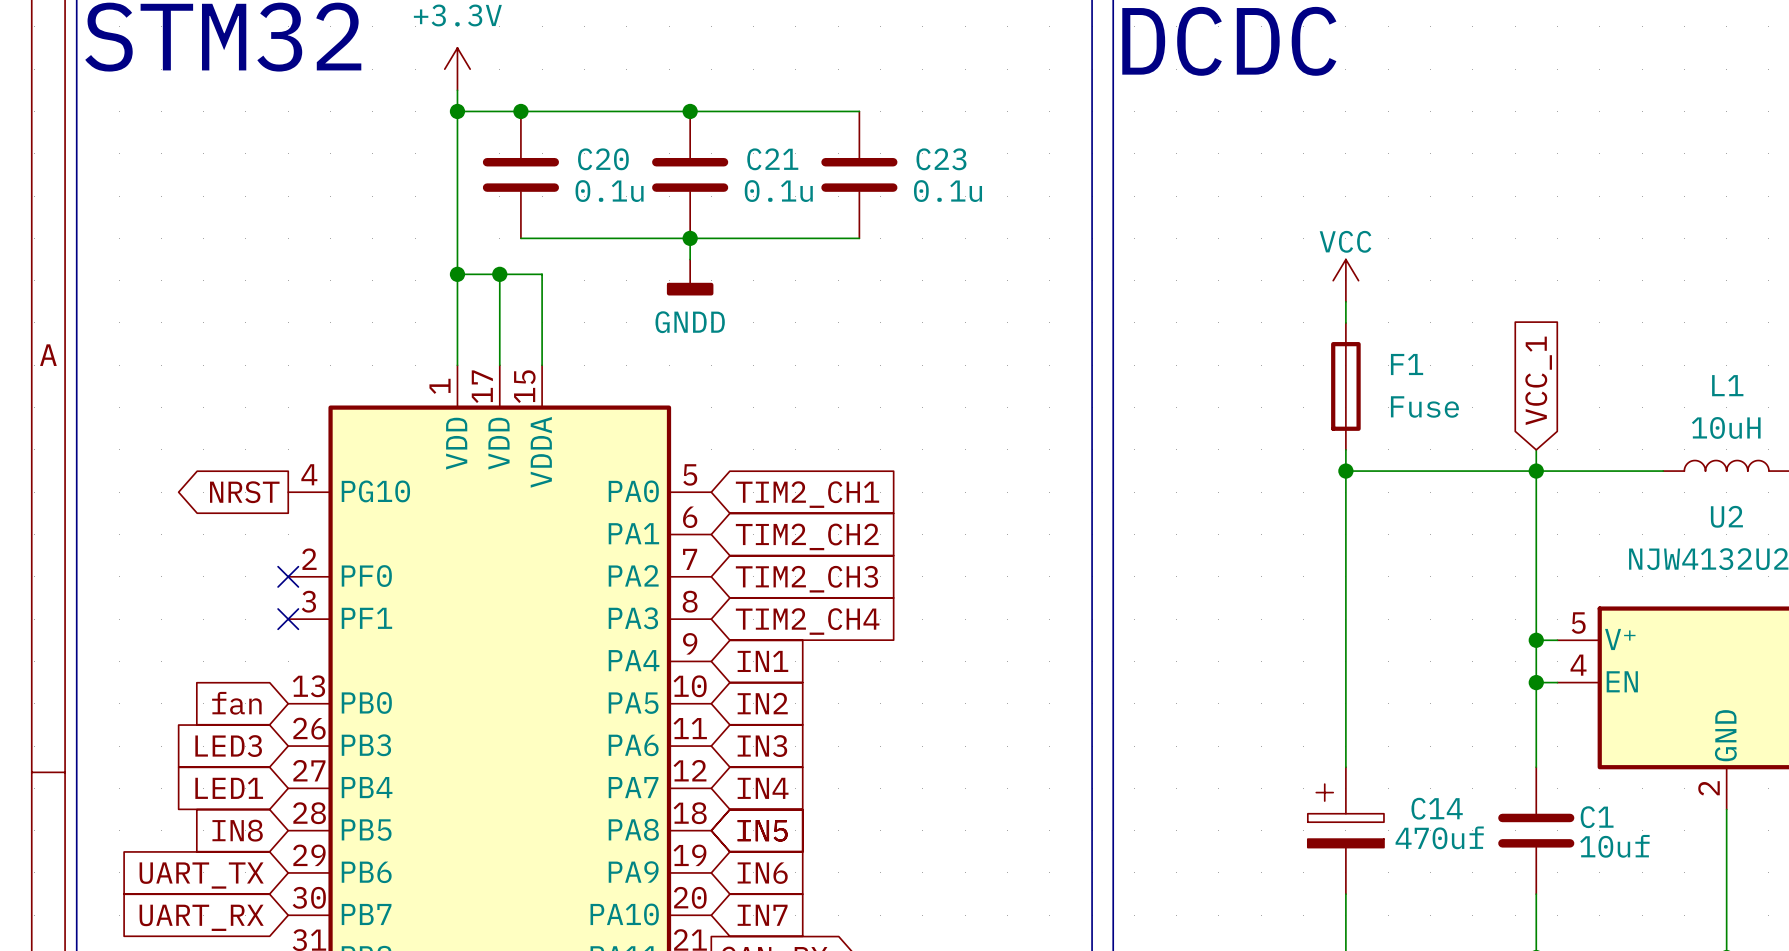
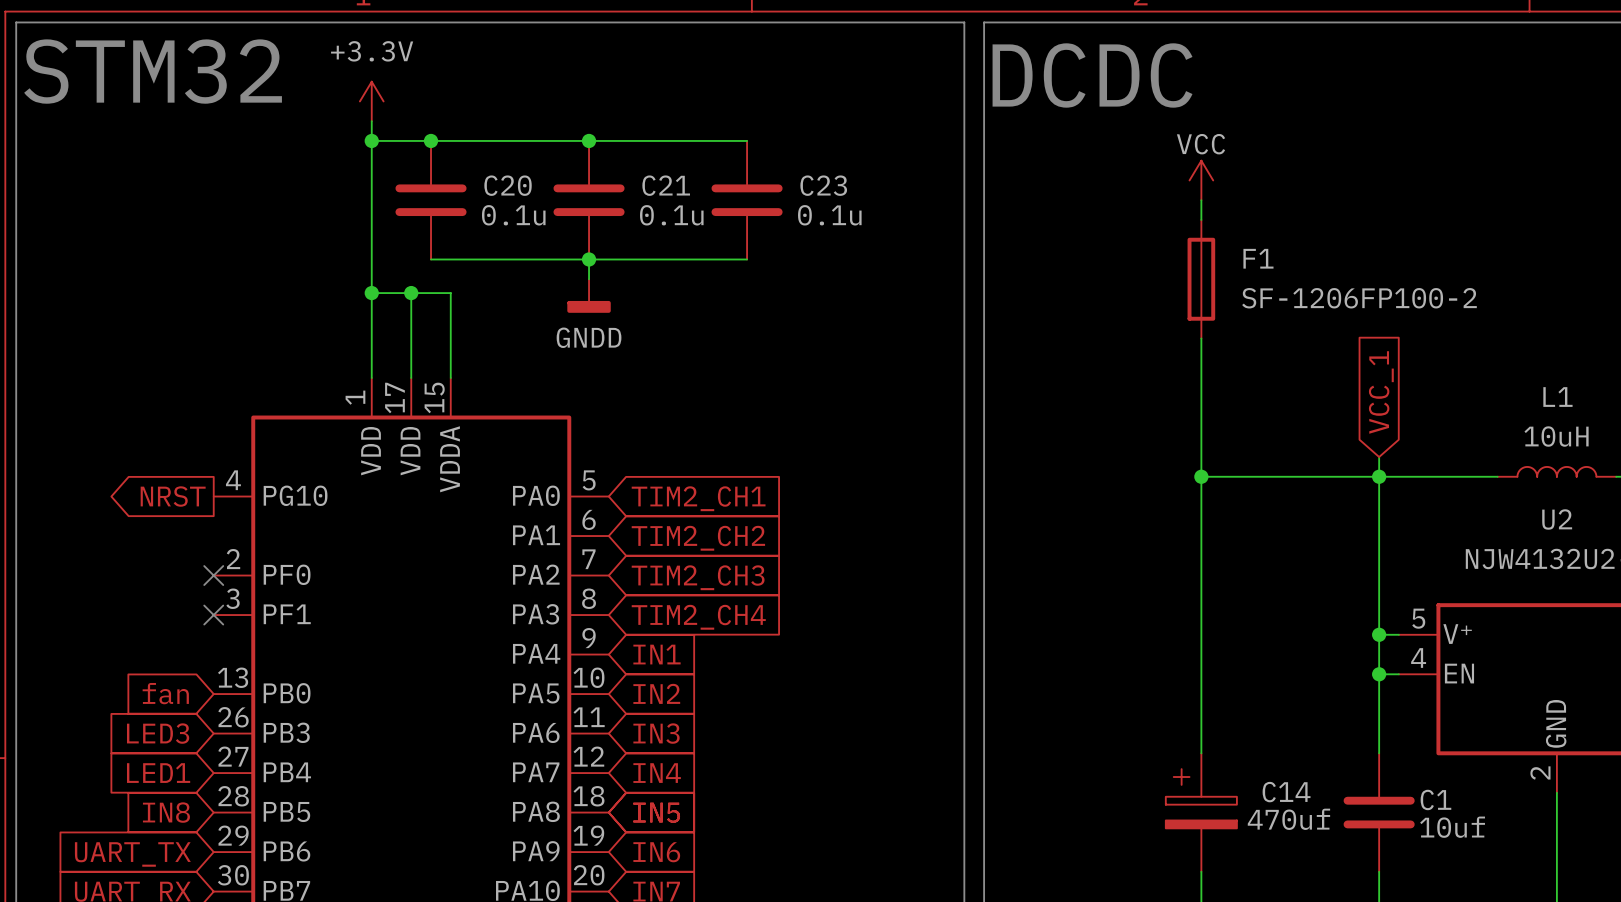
wire: none -> (1201, 200) (1201, 219)
power symbol position: VCC (1345, 280) -> VCC (1201, 180)
F1 position: (1345, 386) -> (1201, 279)
F1 value: Fuse (1424, 406) -> SF-1206FP100-2 (1359, 298)

